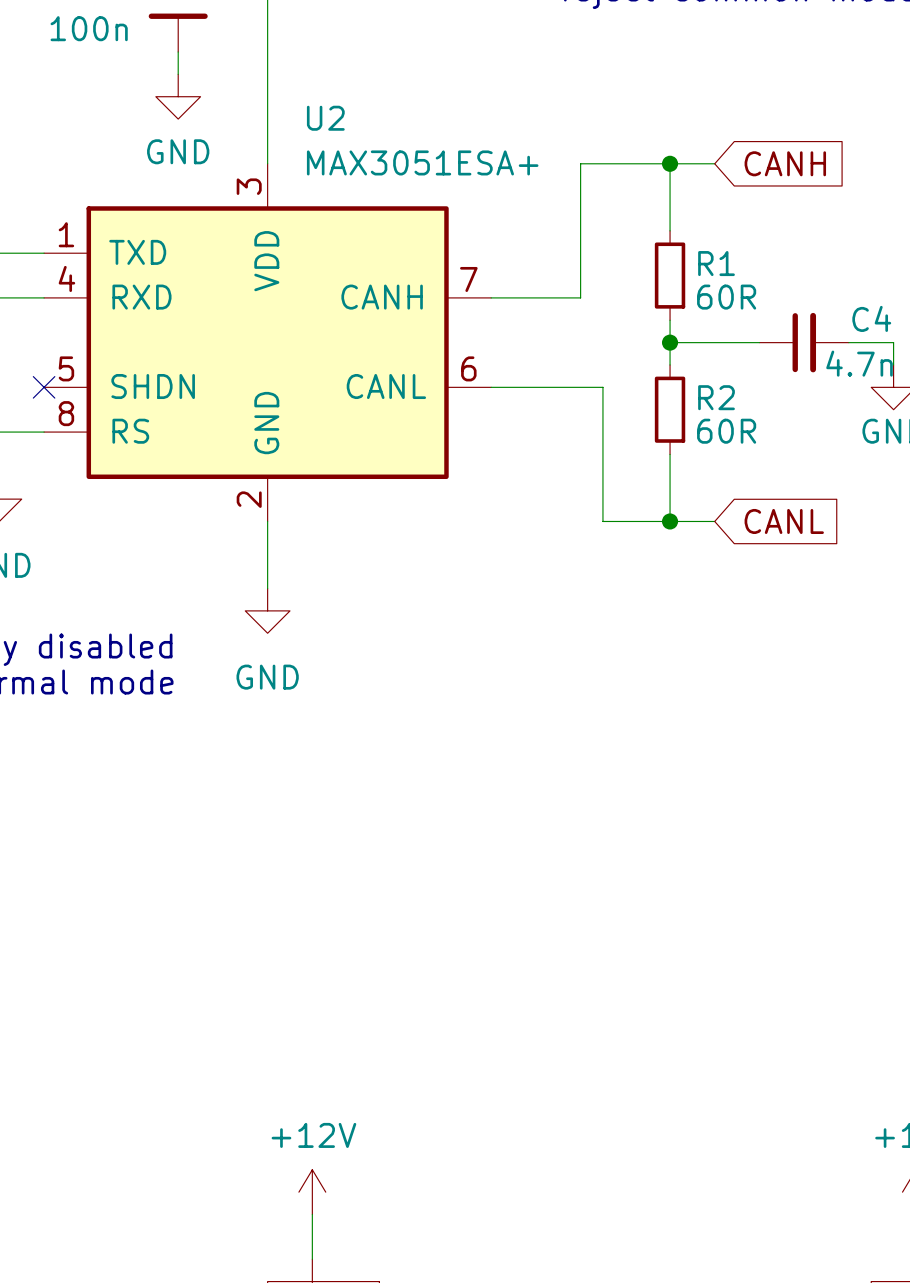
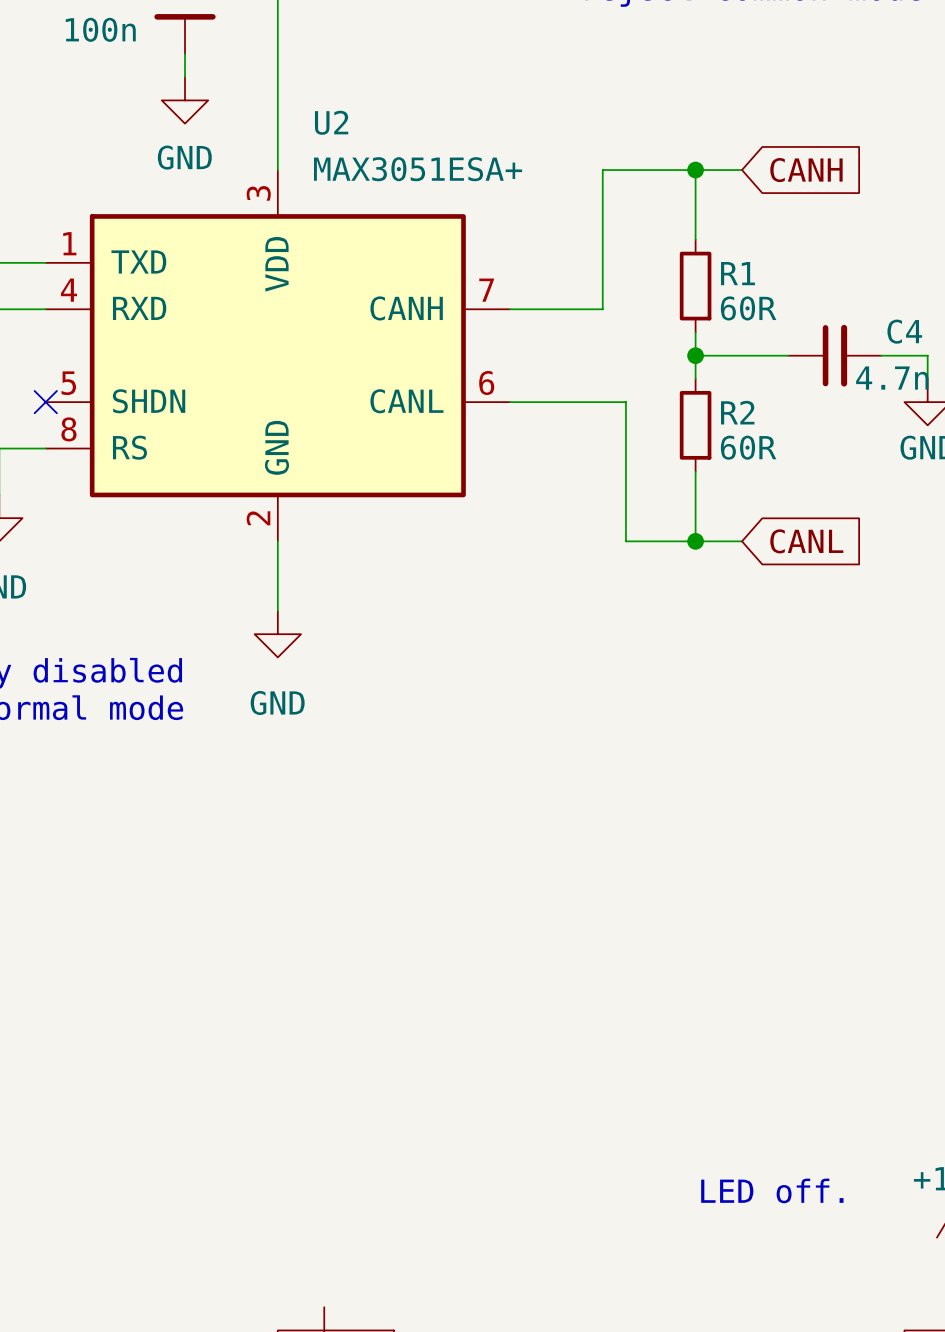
text: none -> LED off. (772, 1190)
power symbol: +12V (312, 1192) -> none
wire: (312, 1214) (312, 1259) -> none

